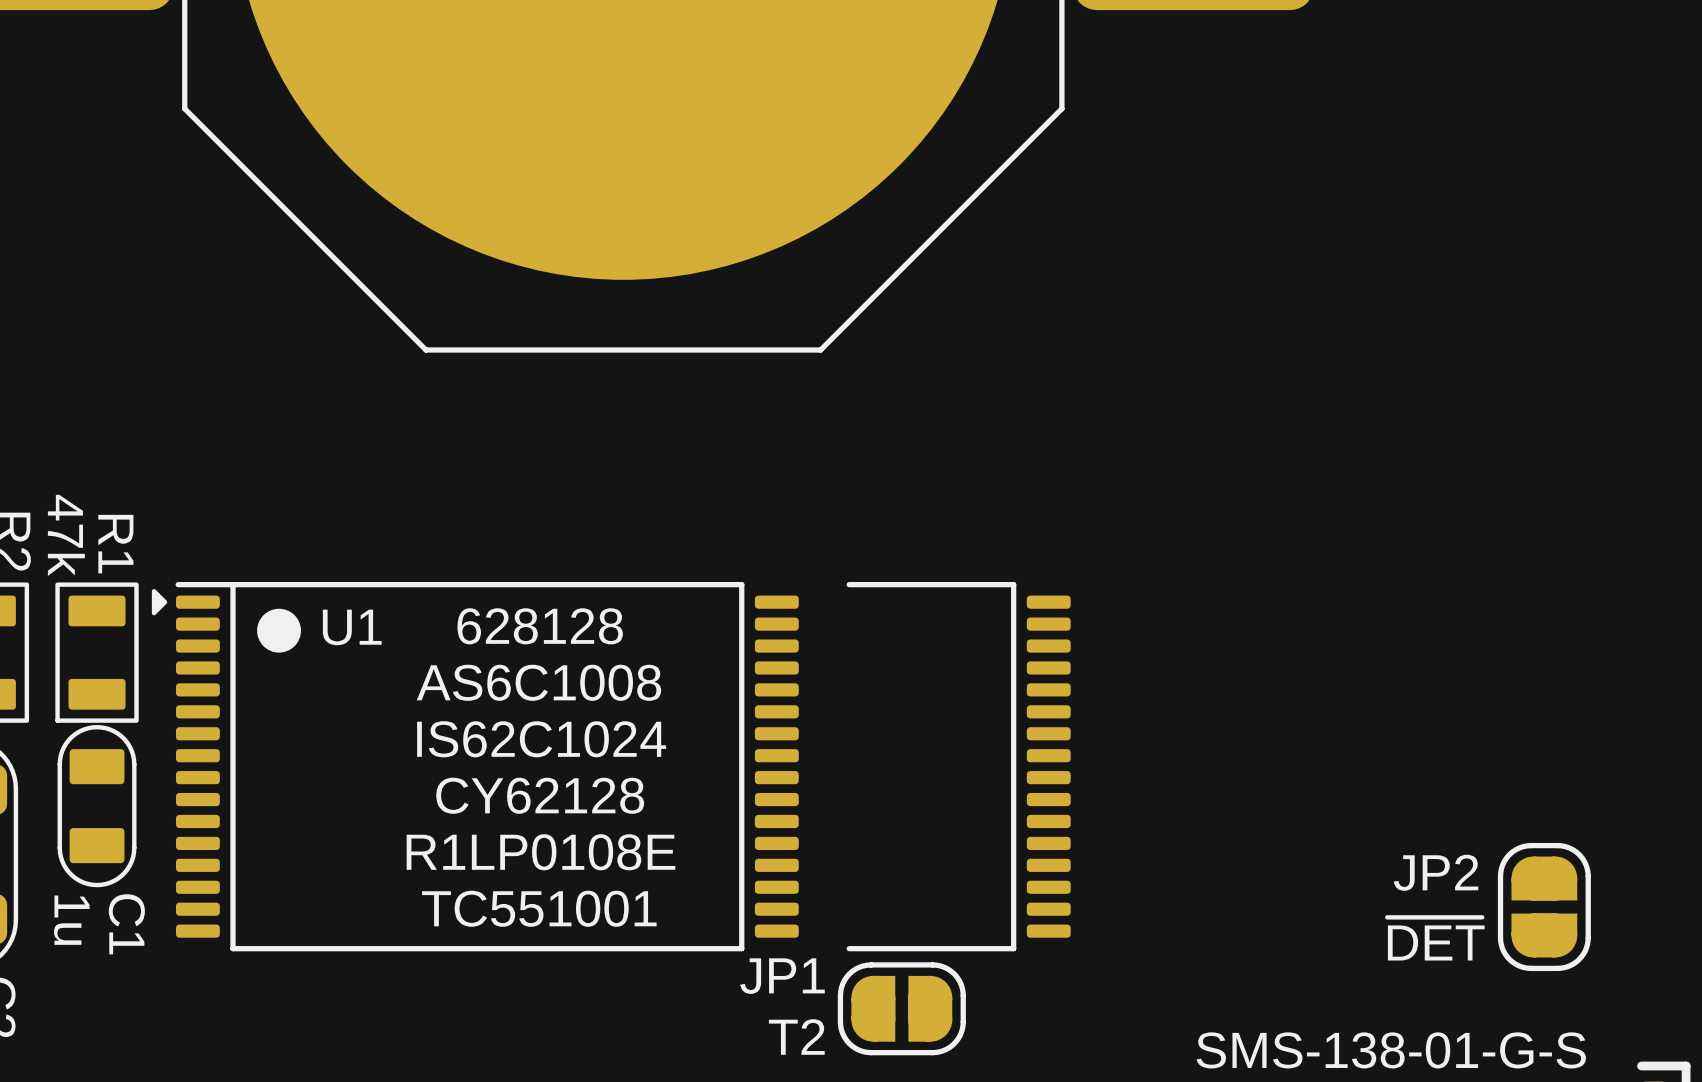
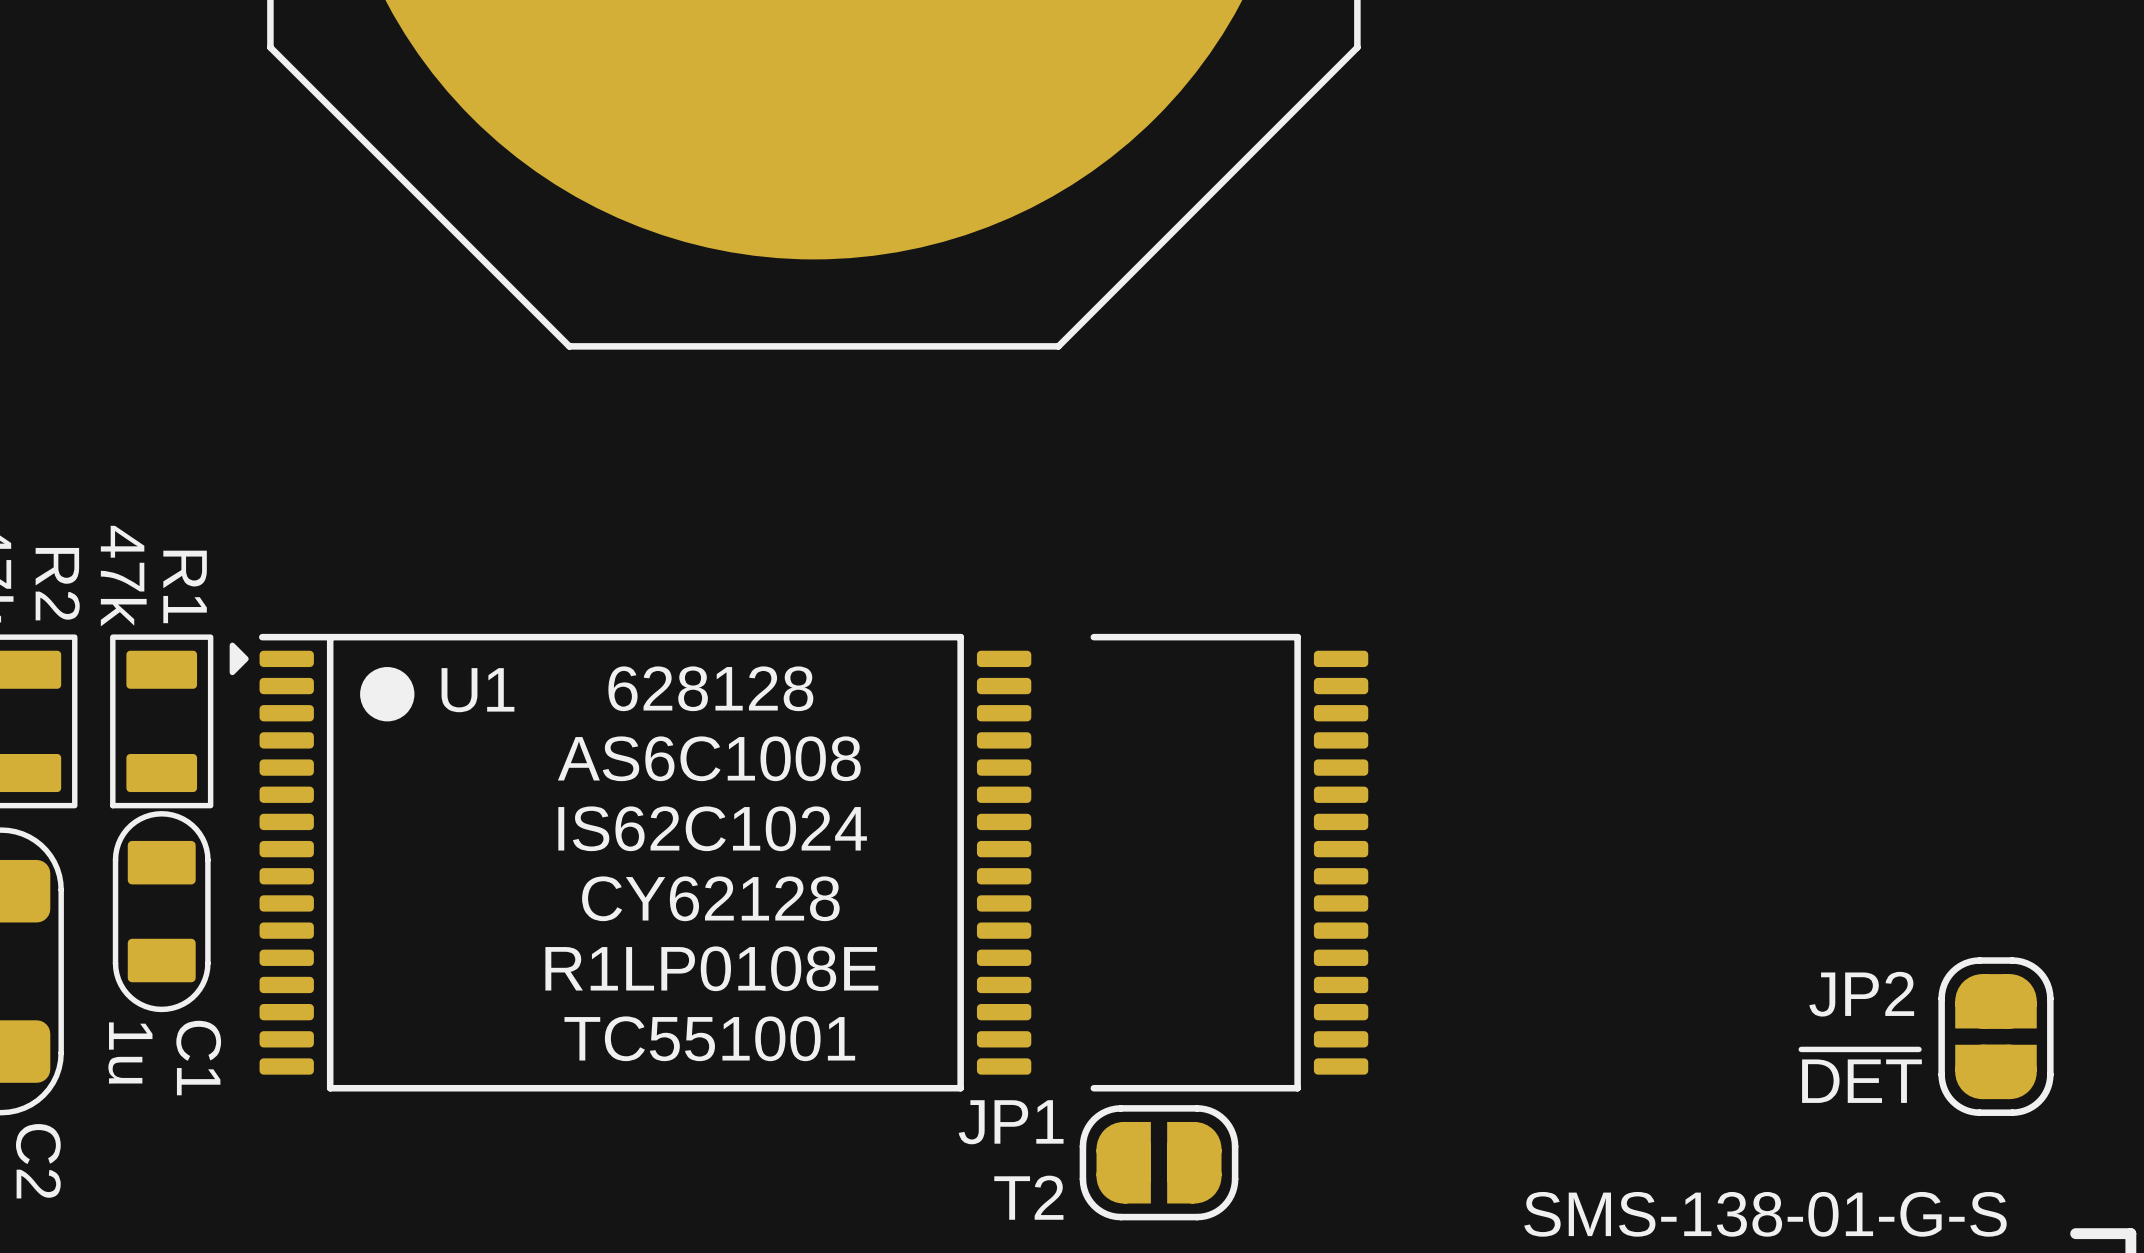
JP2 position: (1544, 907) -> (1995, 1036)

